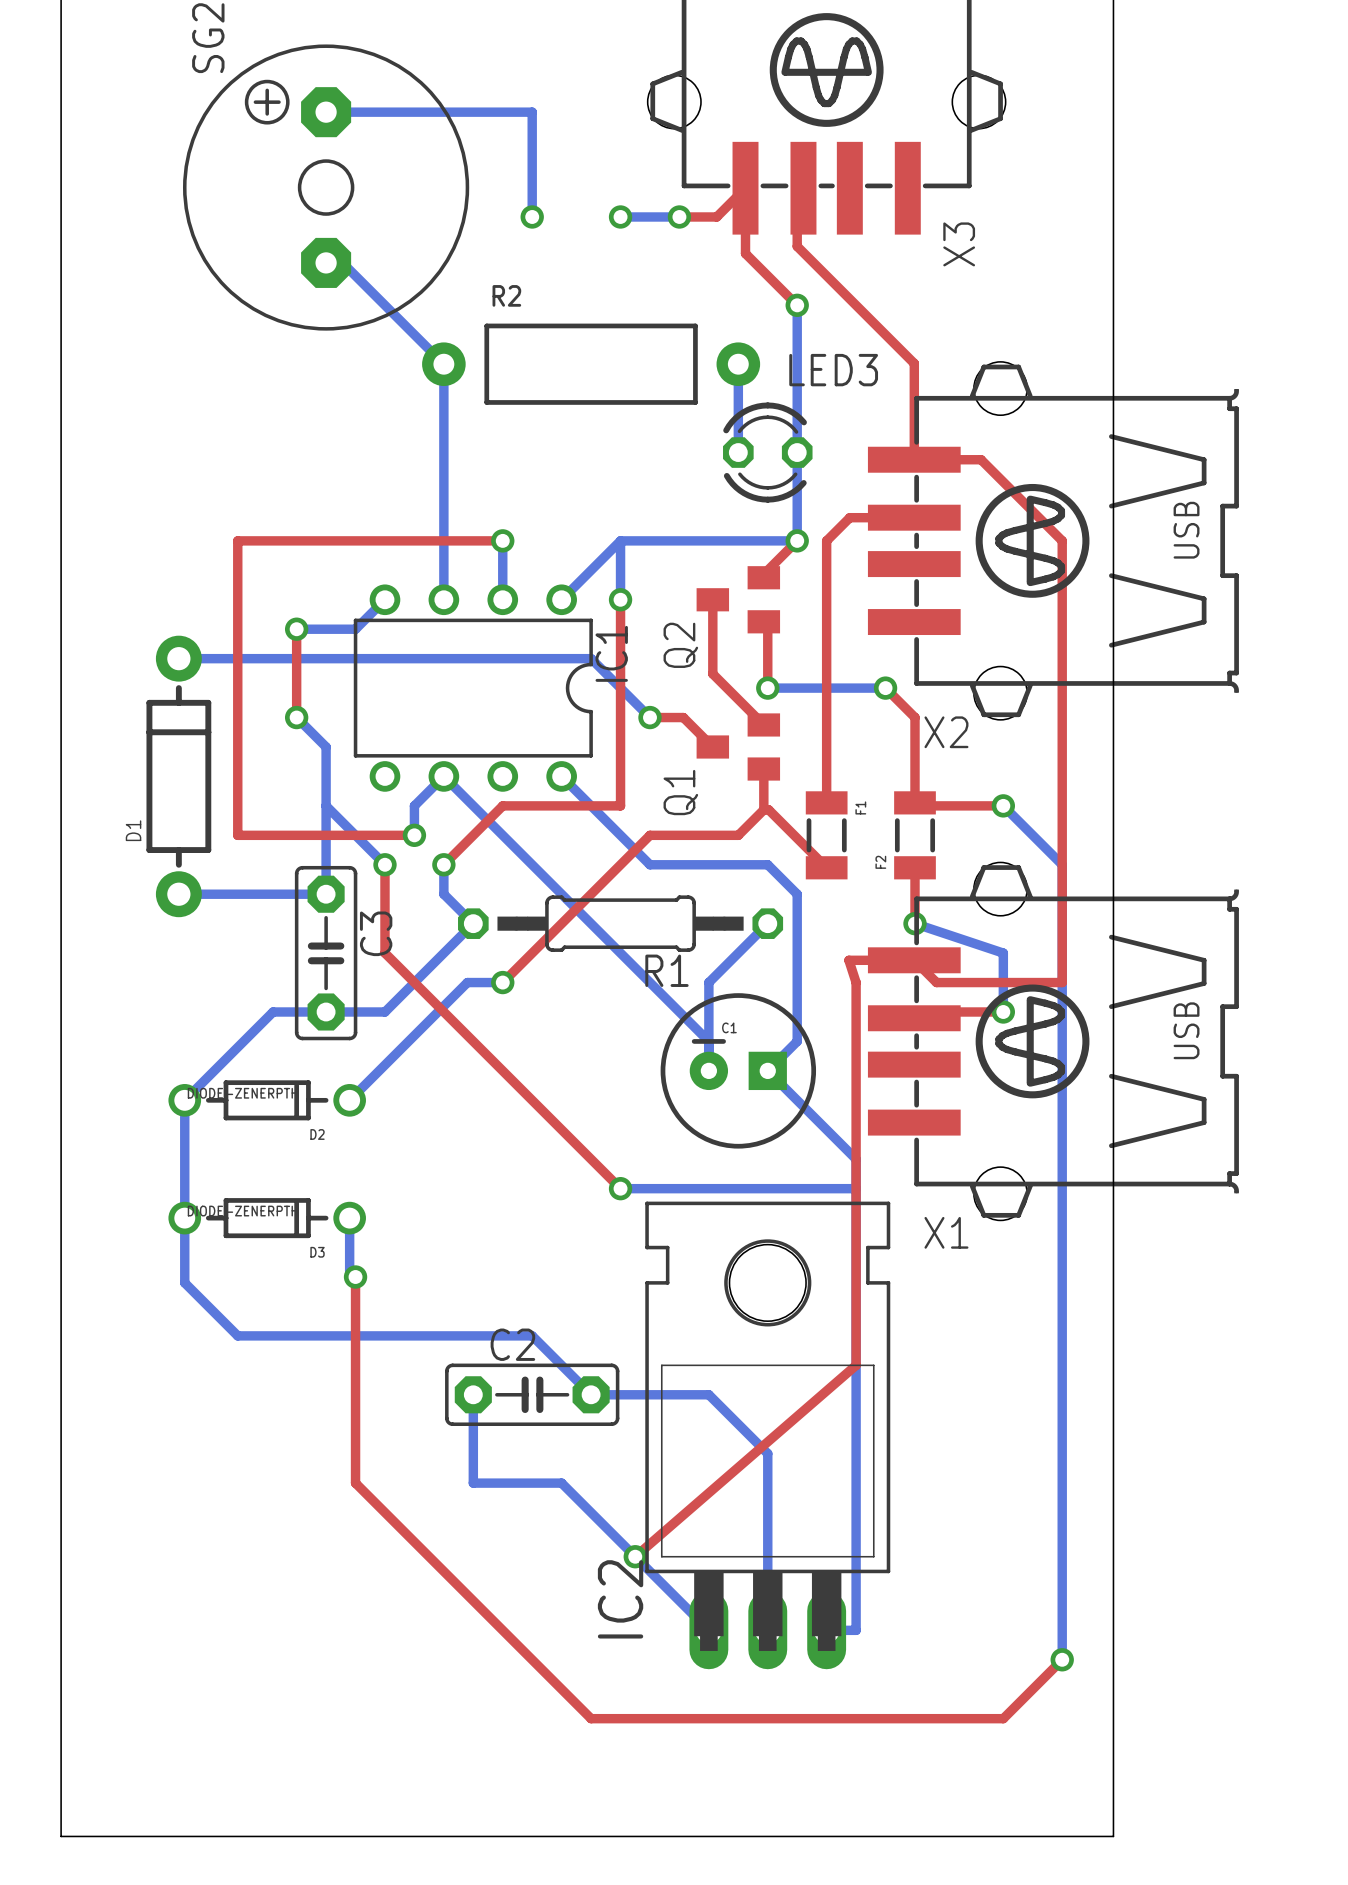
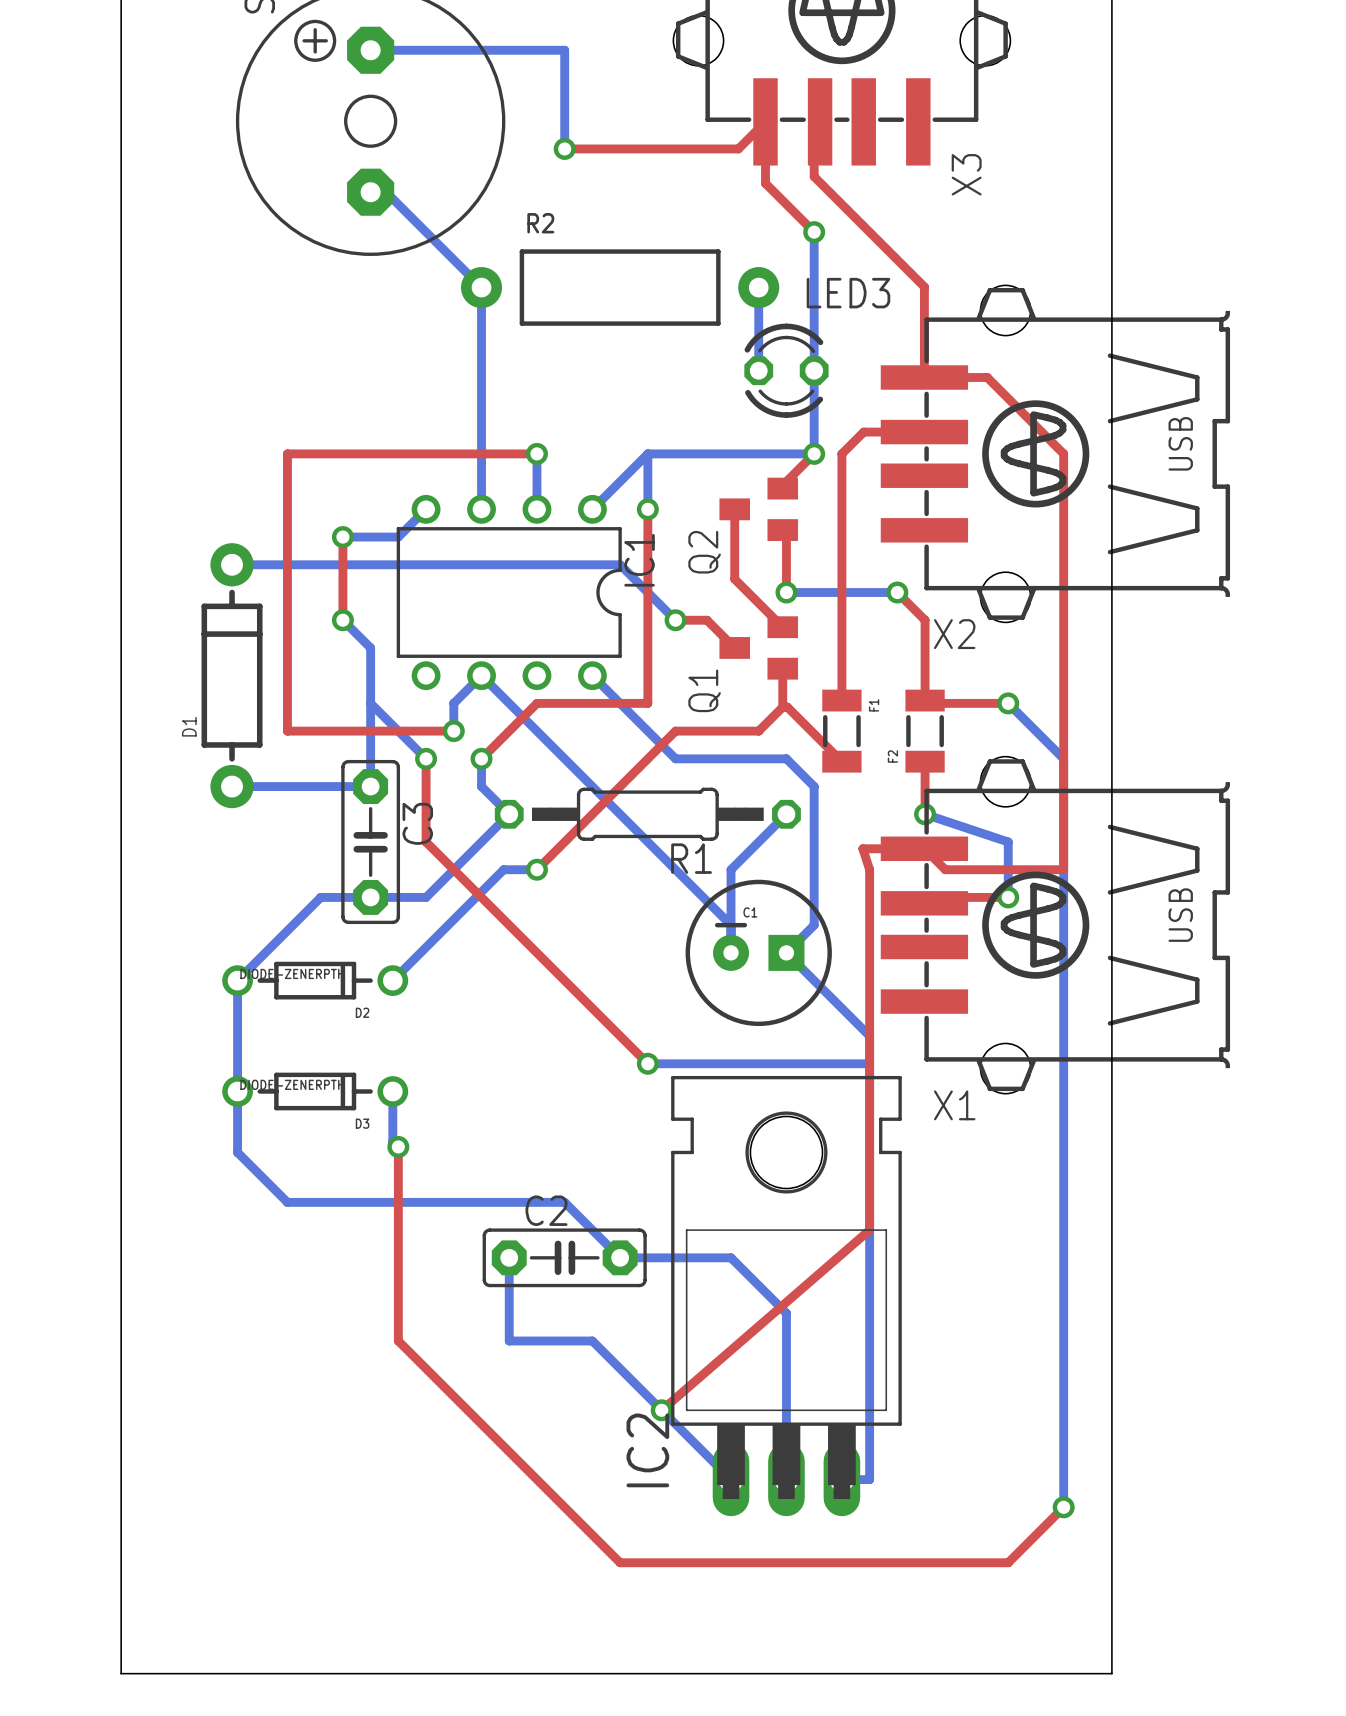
top track: none -> (564, 148) (703, 148)
bottom track: (620, 216) (679, 216) -> none
via: (620, 216) -> none
via: (679, 216) -> none

